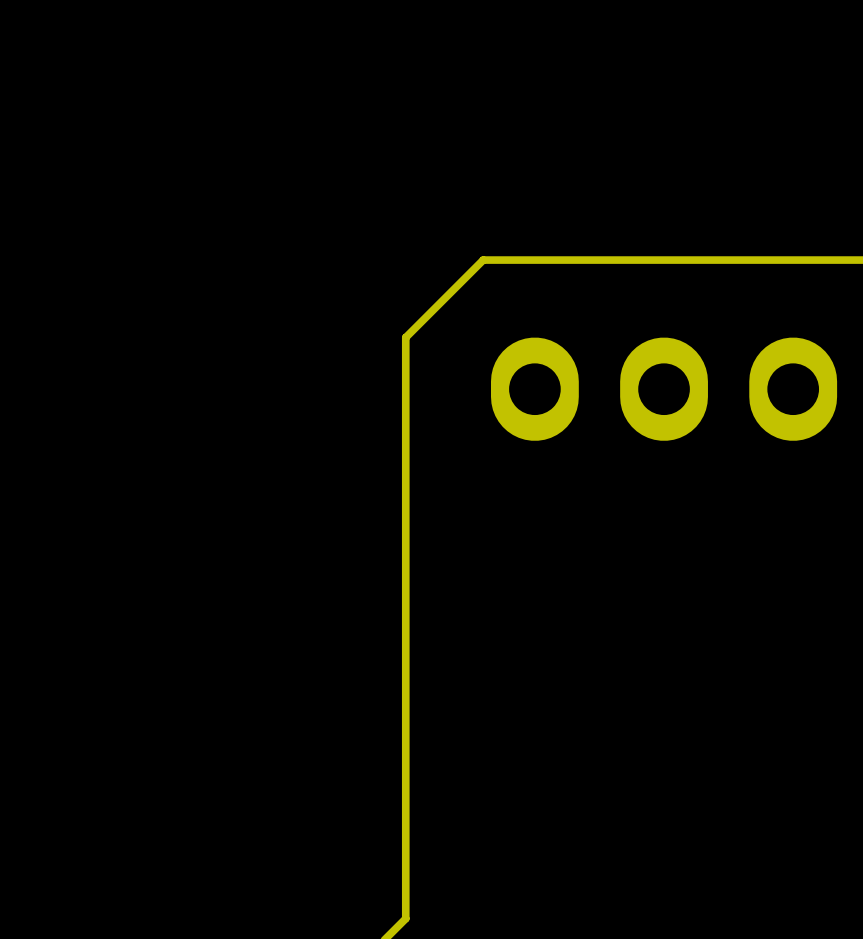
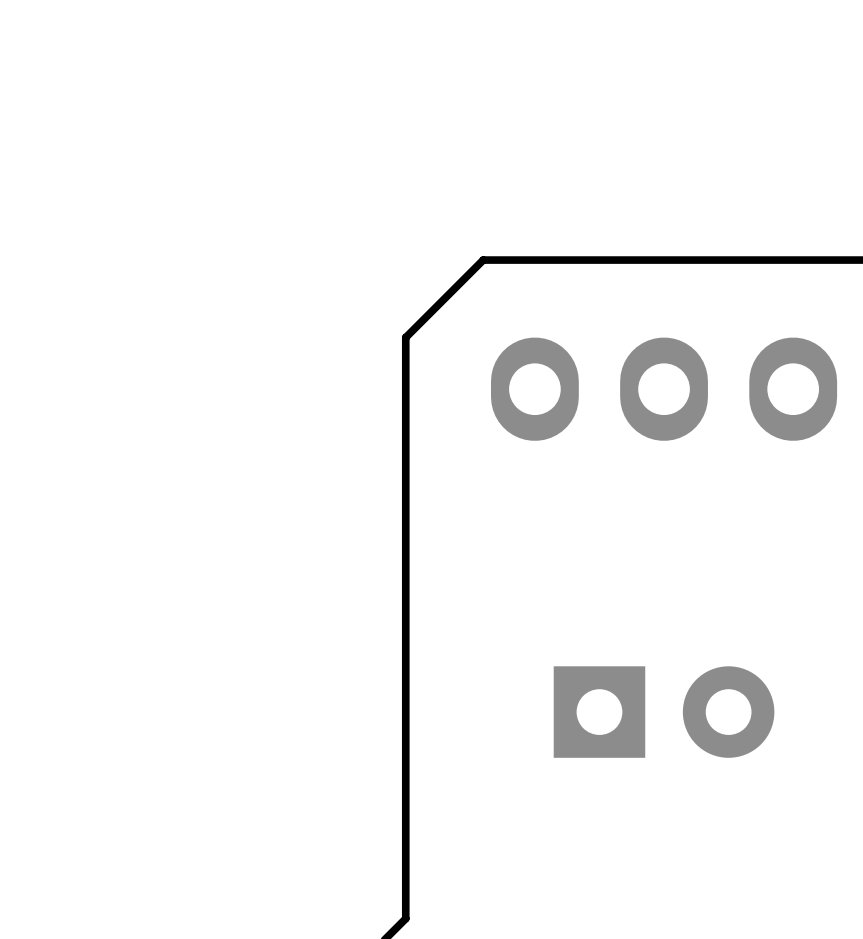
part: none -> (664, 712)

